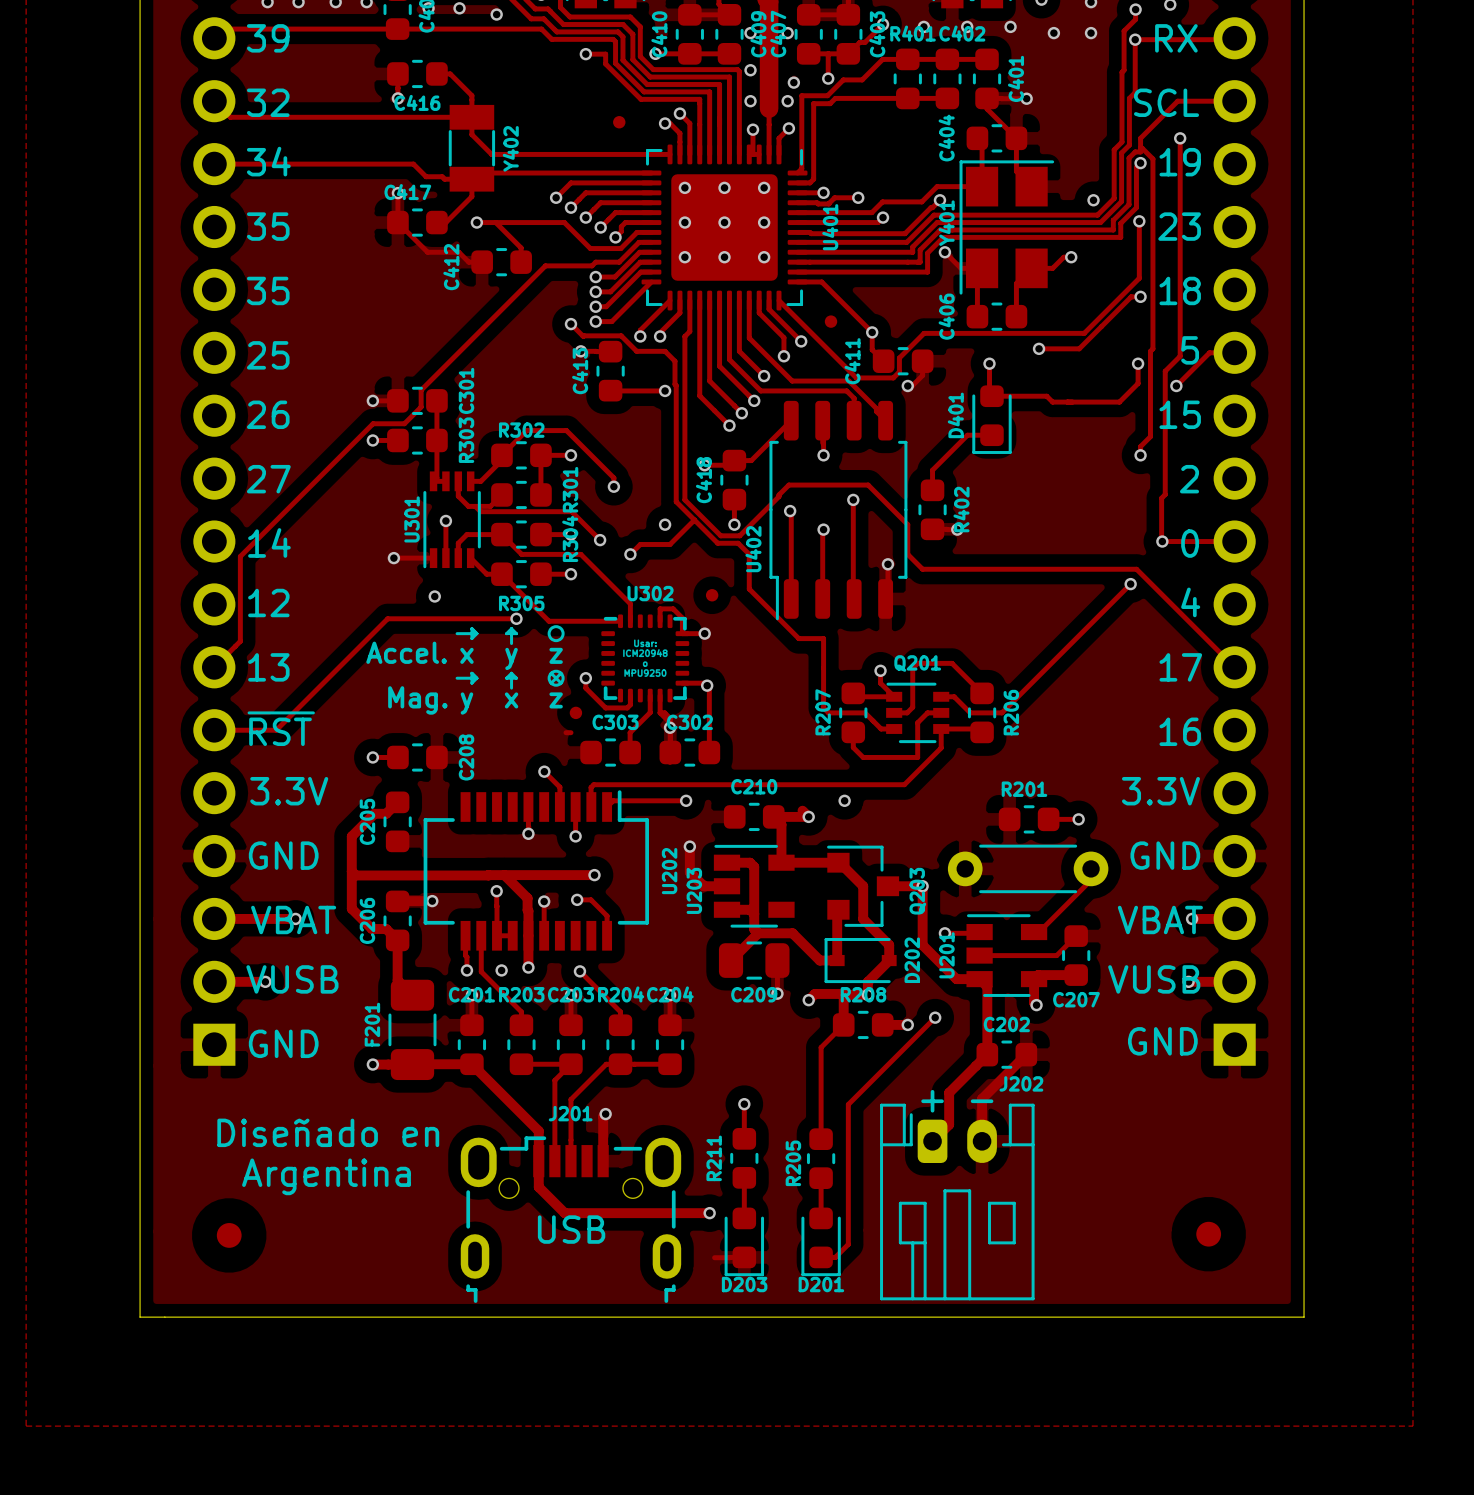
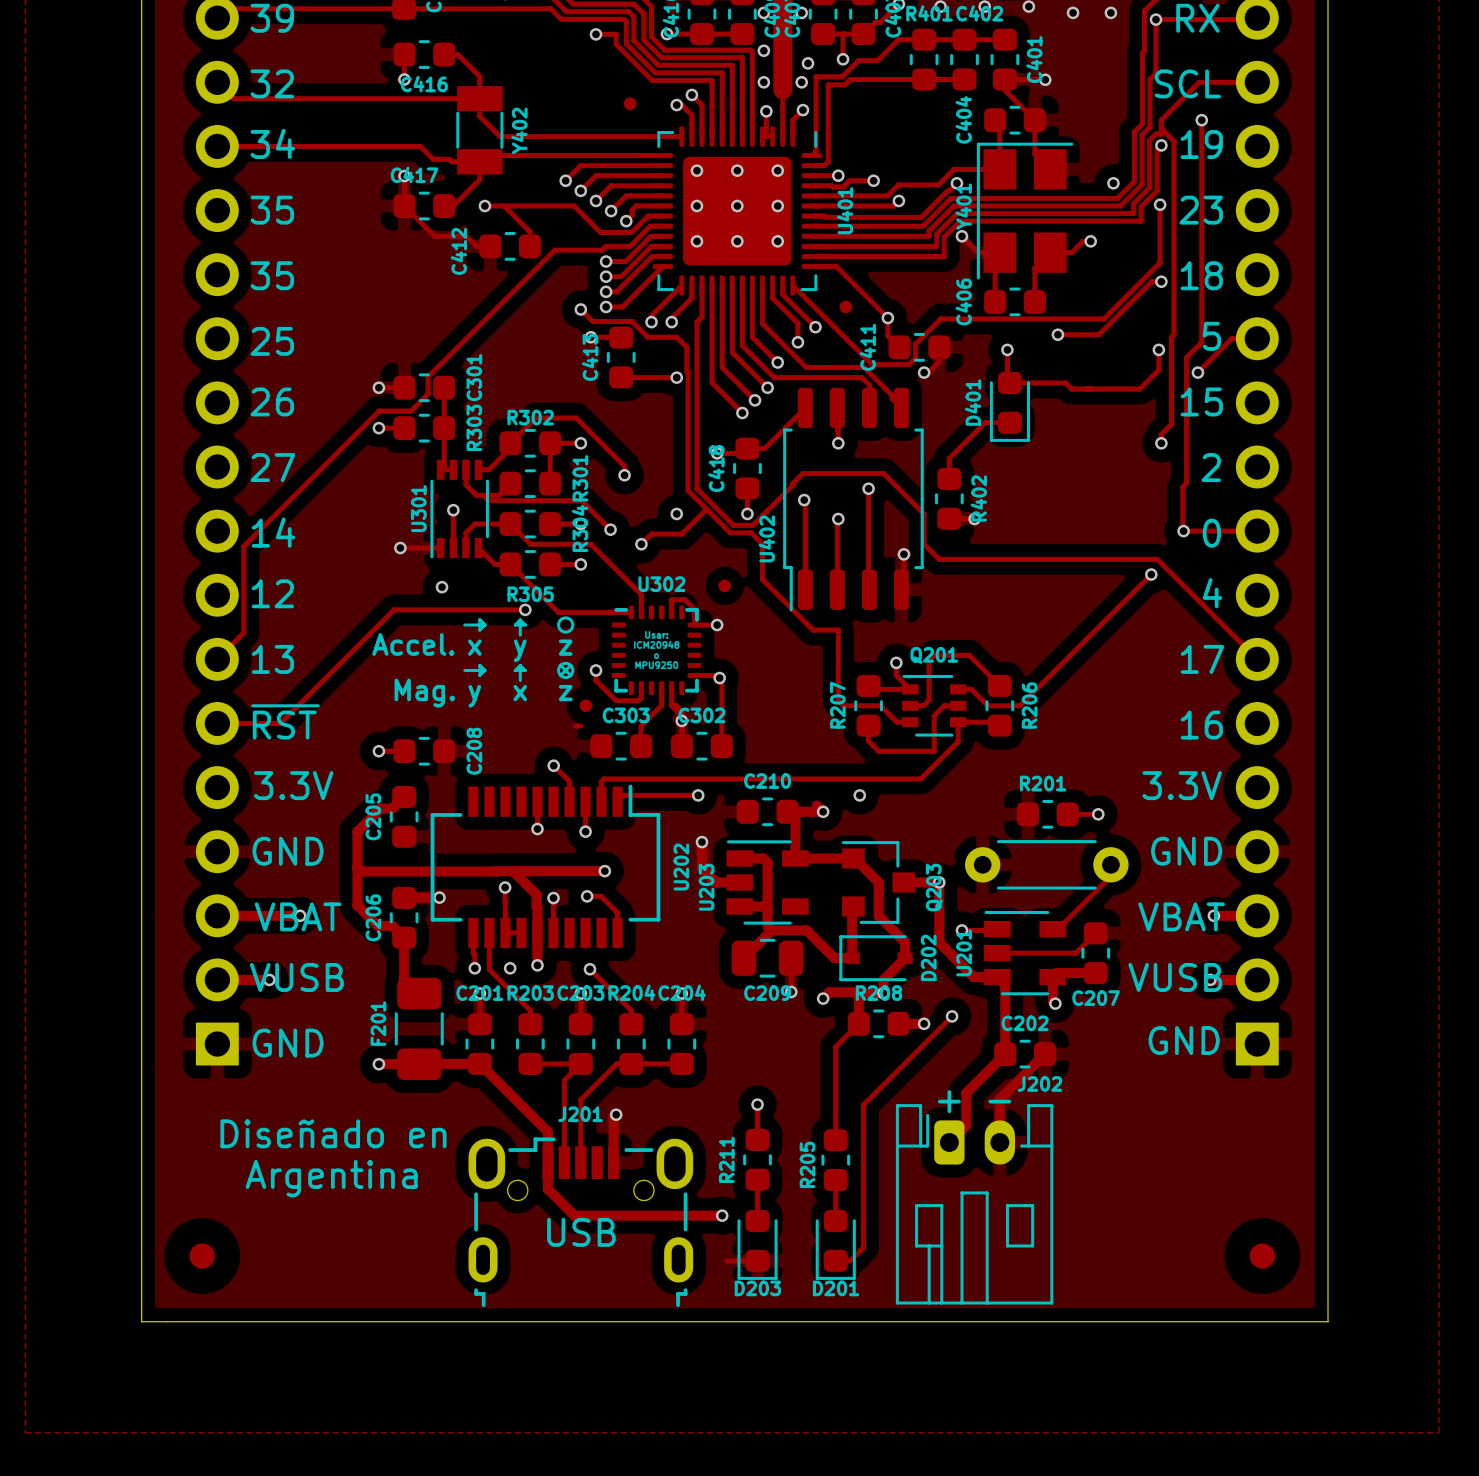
part position: (1208, 1234) -> (1262, 1256)
part position: (229, 1235) -> (202, 1256)

